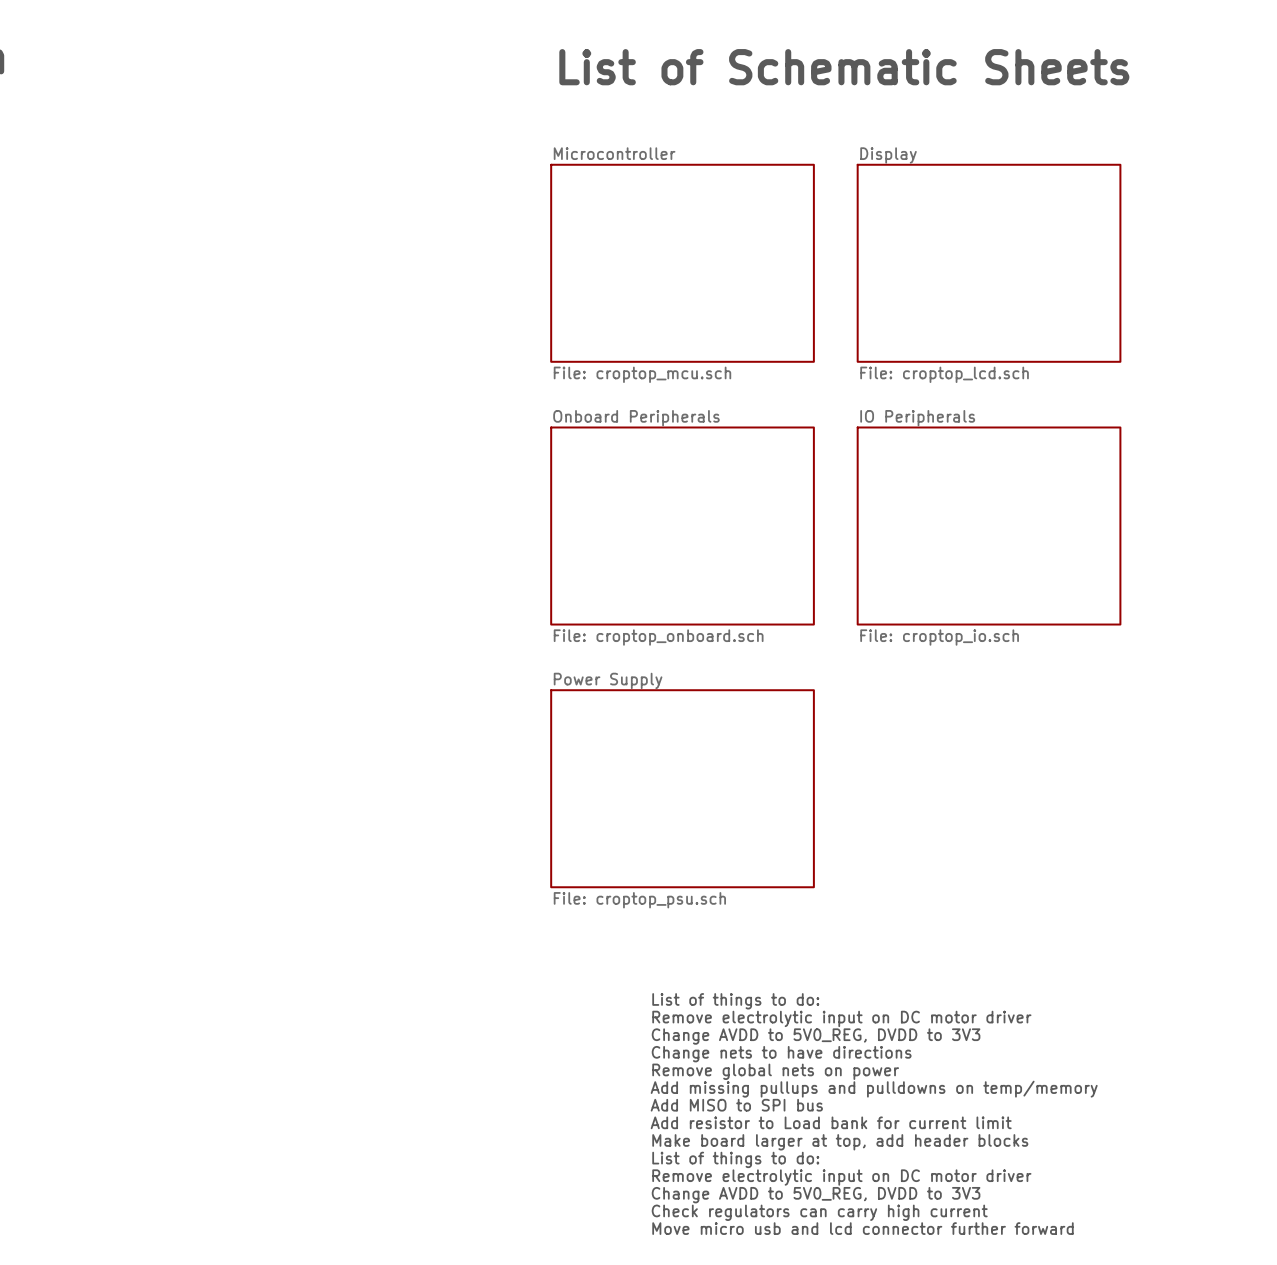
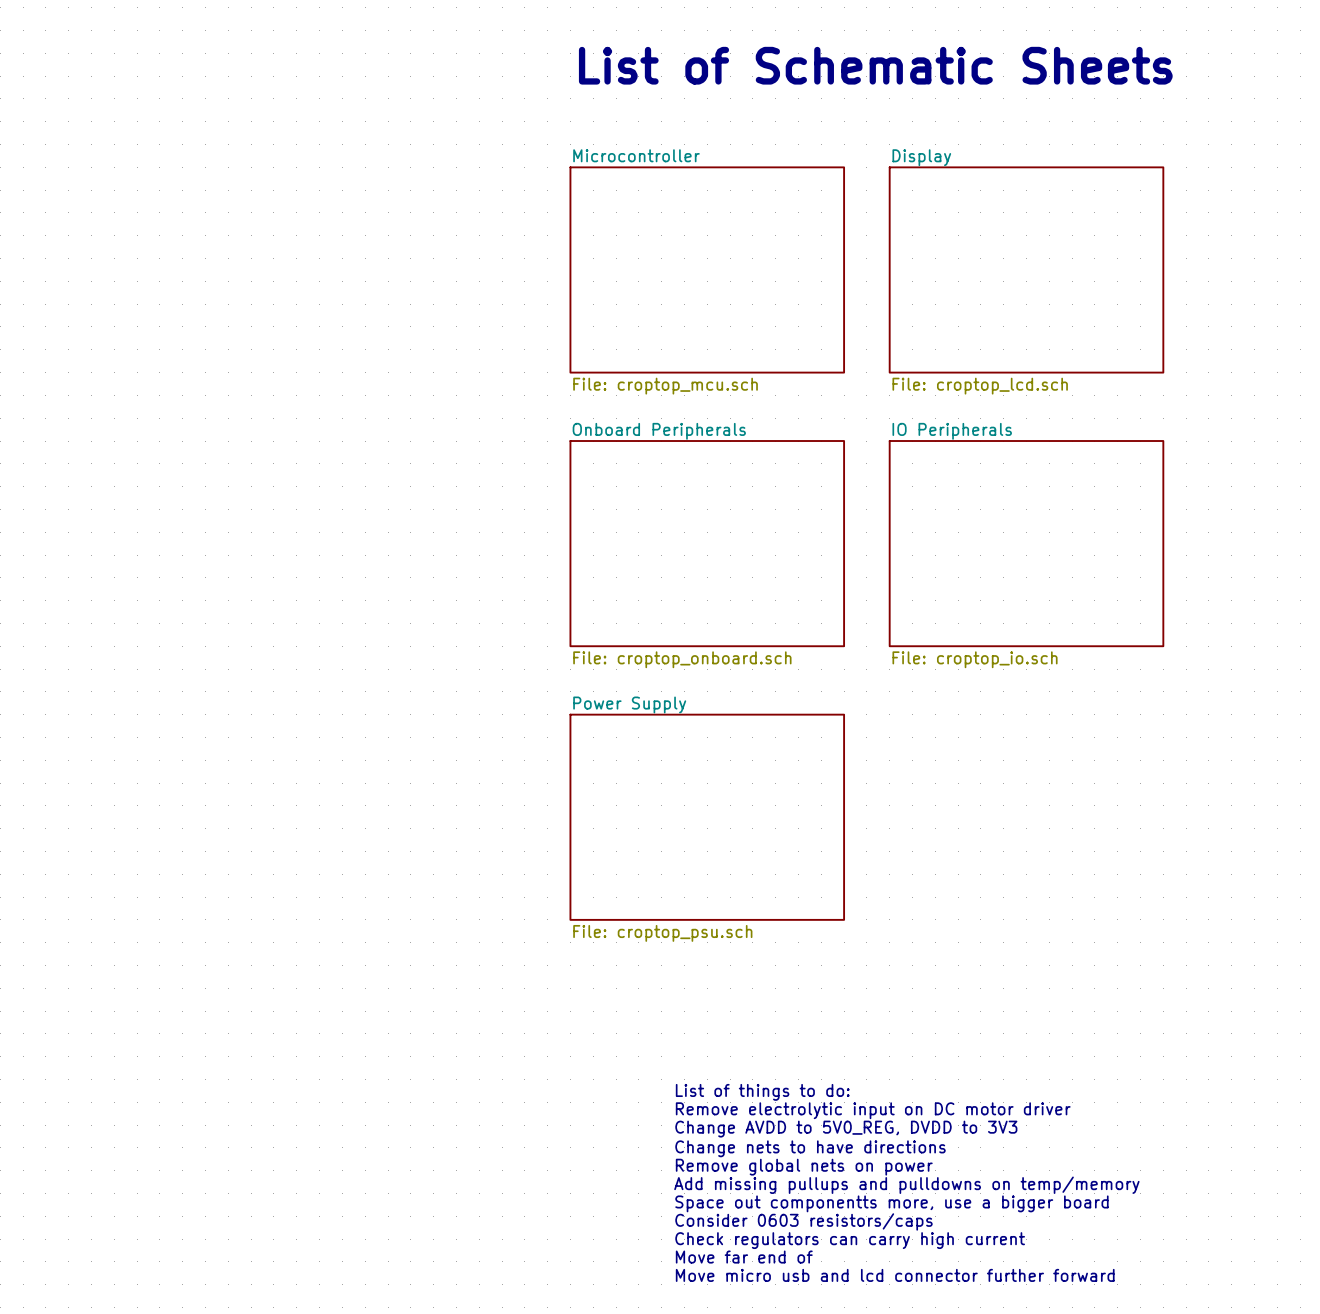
text position: List of things to do: (735, 1001) -> List of things to do: (762, 1092)
text position: Remove electrolytic input on DC motor driver (841, 1018) -> Remove electrolytic input on DC motor driver (873, 1110)
text position: Change AVDD to 5V0_REG, DVDD to 3V3 (816, 1036) -> Change AVDD to 5V0_REG, DVDD to 3V3 (846, 1129)
text: Change nets to have directions (781, 1054) -> none
text: Remove global nets on power (775, 1071) -> none
text: Add missing pullups and pulldowns on temp/memory (874, 1089) -> none
text: Add MISO to SPI bus (736, 1105) -> Change nets to have directions (810, 1148)
text: Add resistor to Load bank for current limit (831, 1122) -> Remove global nets on power (804, 1167)
text: Make board larger at top, add header blocks (840, 1142) -> Add missing pullups and pulldowns on temp/memory (906, 1185)
text: List of things to do: (735, 1159) -> Space out componentts more, use a bigger board (891, 1203)
text: Remove electrolytic input on DC motor driver (841, 1177) -> Consider 0603 resistors/caps (803, 1221)
text: Change AVDD to 5V0_REG, DVDD to 3V3 (816, 1195) -> Check regulators can carry high current (850, 1240)
text: Check regulators can carry high current (819, 1212) -> Move far end of (744, 1257)

